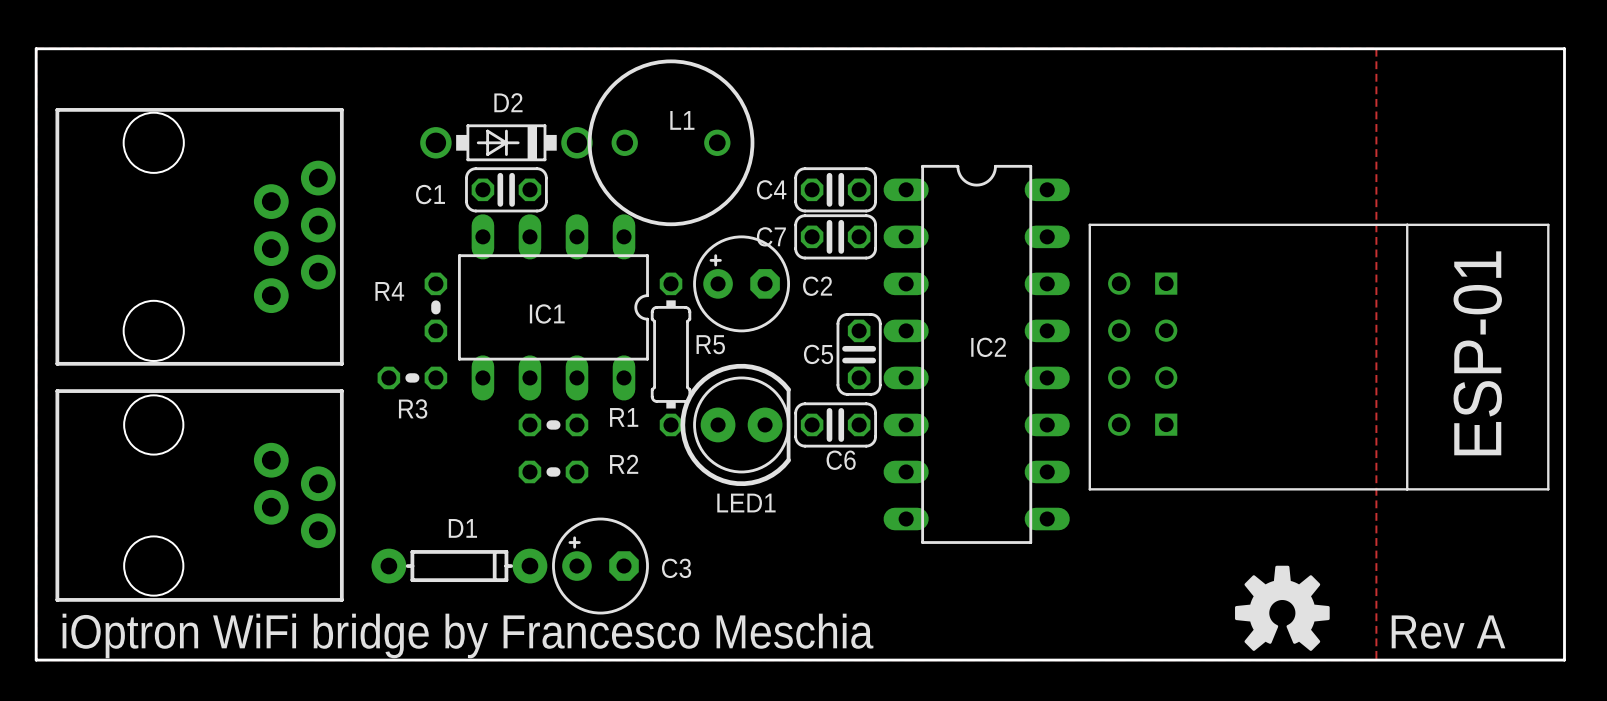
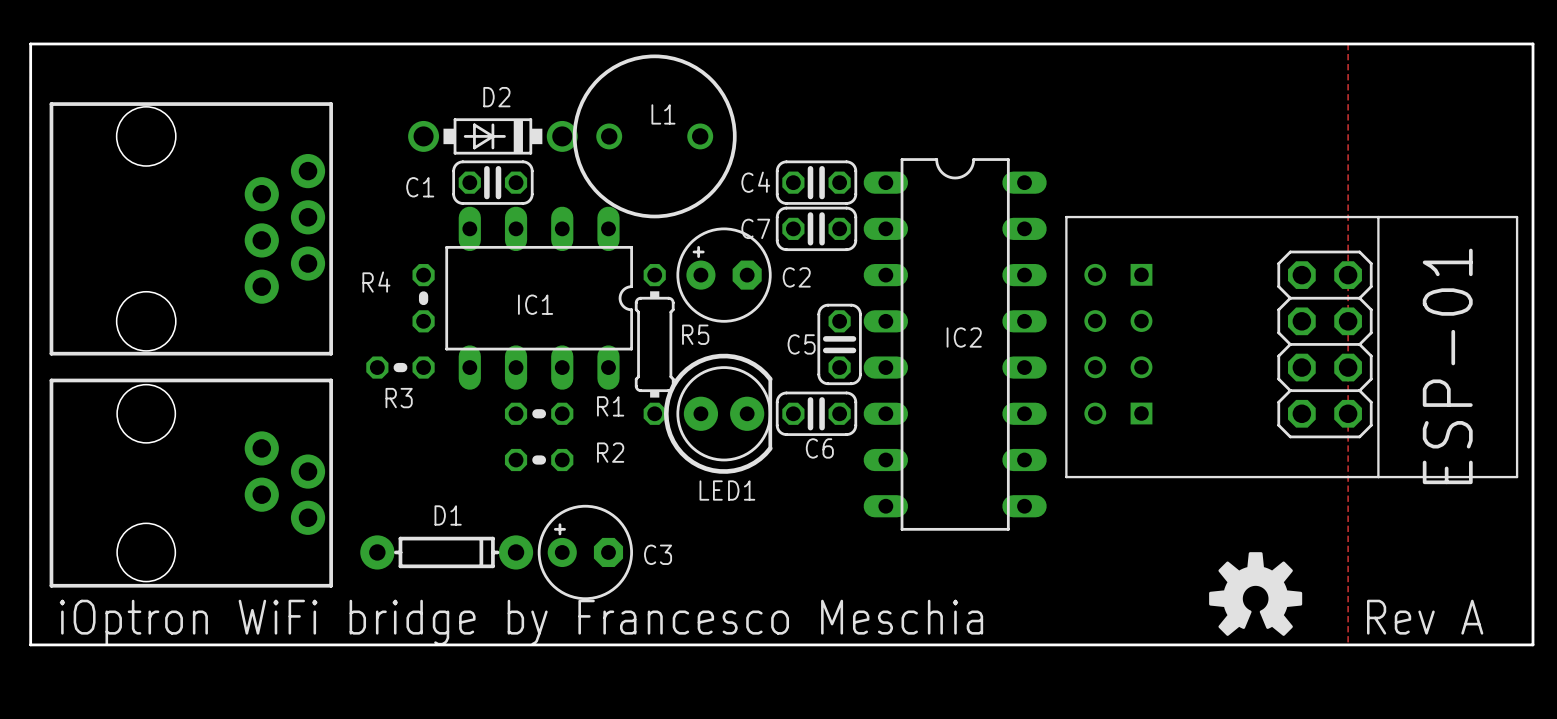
part: none -> (1324, 344)

